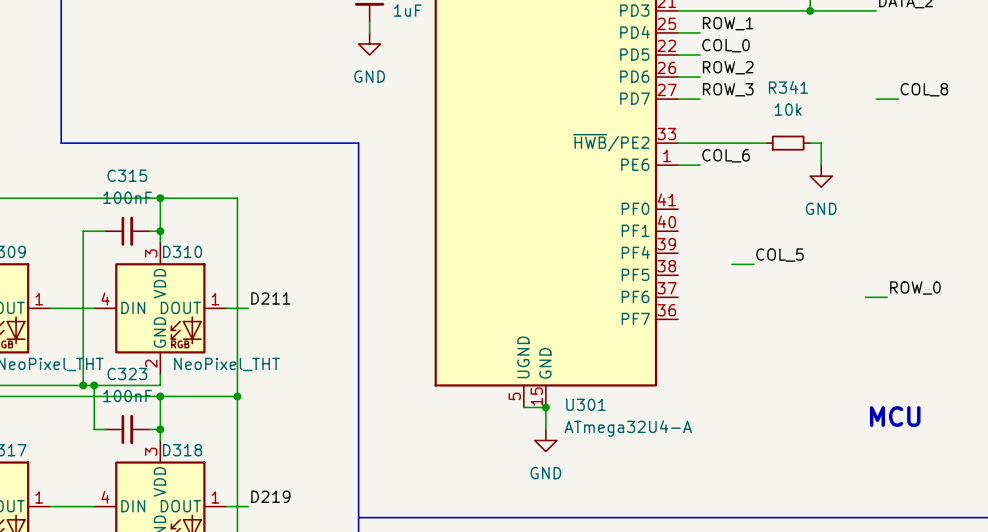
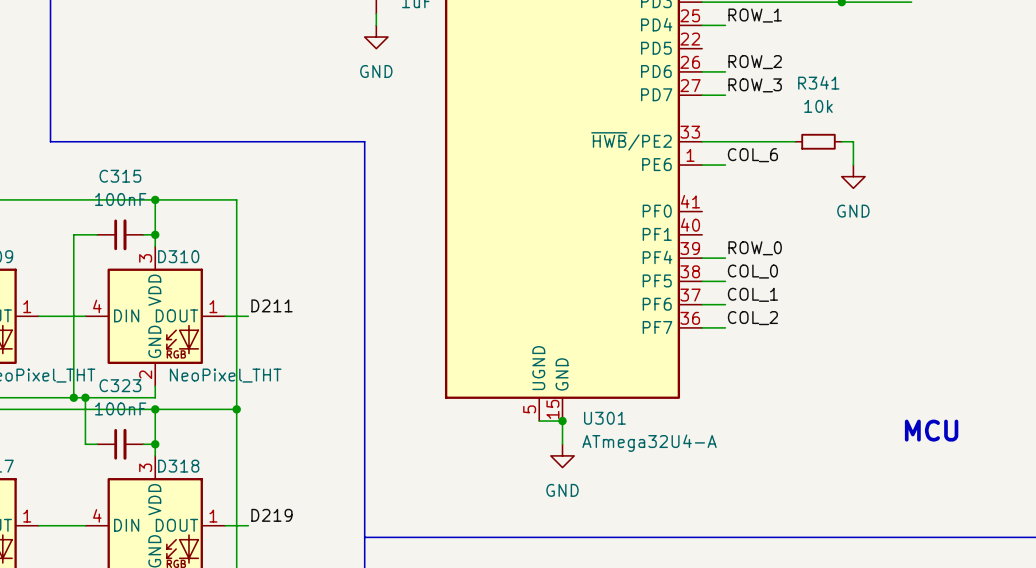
label: COL_0 (726, 45) -> none
wire: (678, 54) (700, 54) -> (702, 258) (725, 258)
label: COL_8 (924, 89) -> none
wire: (876, 99) (898, 99) -> none
label: COL_5 (779, 255) -> COL_0 (752, 271)
wire: (731, 264) (753, 264) -> (702, 281) (725, 281)
label: none -> COL_1 (752, 294)
label position: ROW_0 (915, 288) -> ROW_0 (755, 248)
wire: (865, 297) (887, 297) -> (702, 304) (725, 304)
label: none -> COL_2 (752, 318)
wire: none -> (702, 327) (725, 327)

